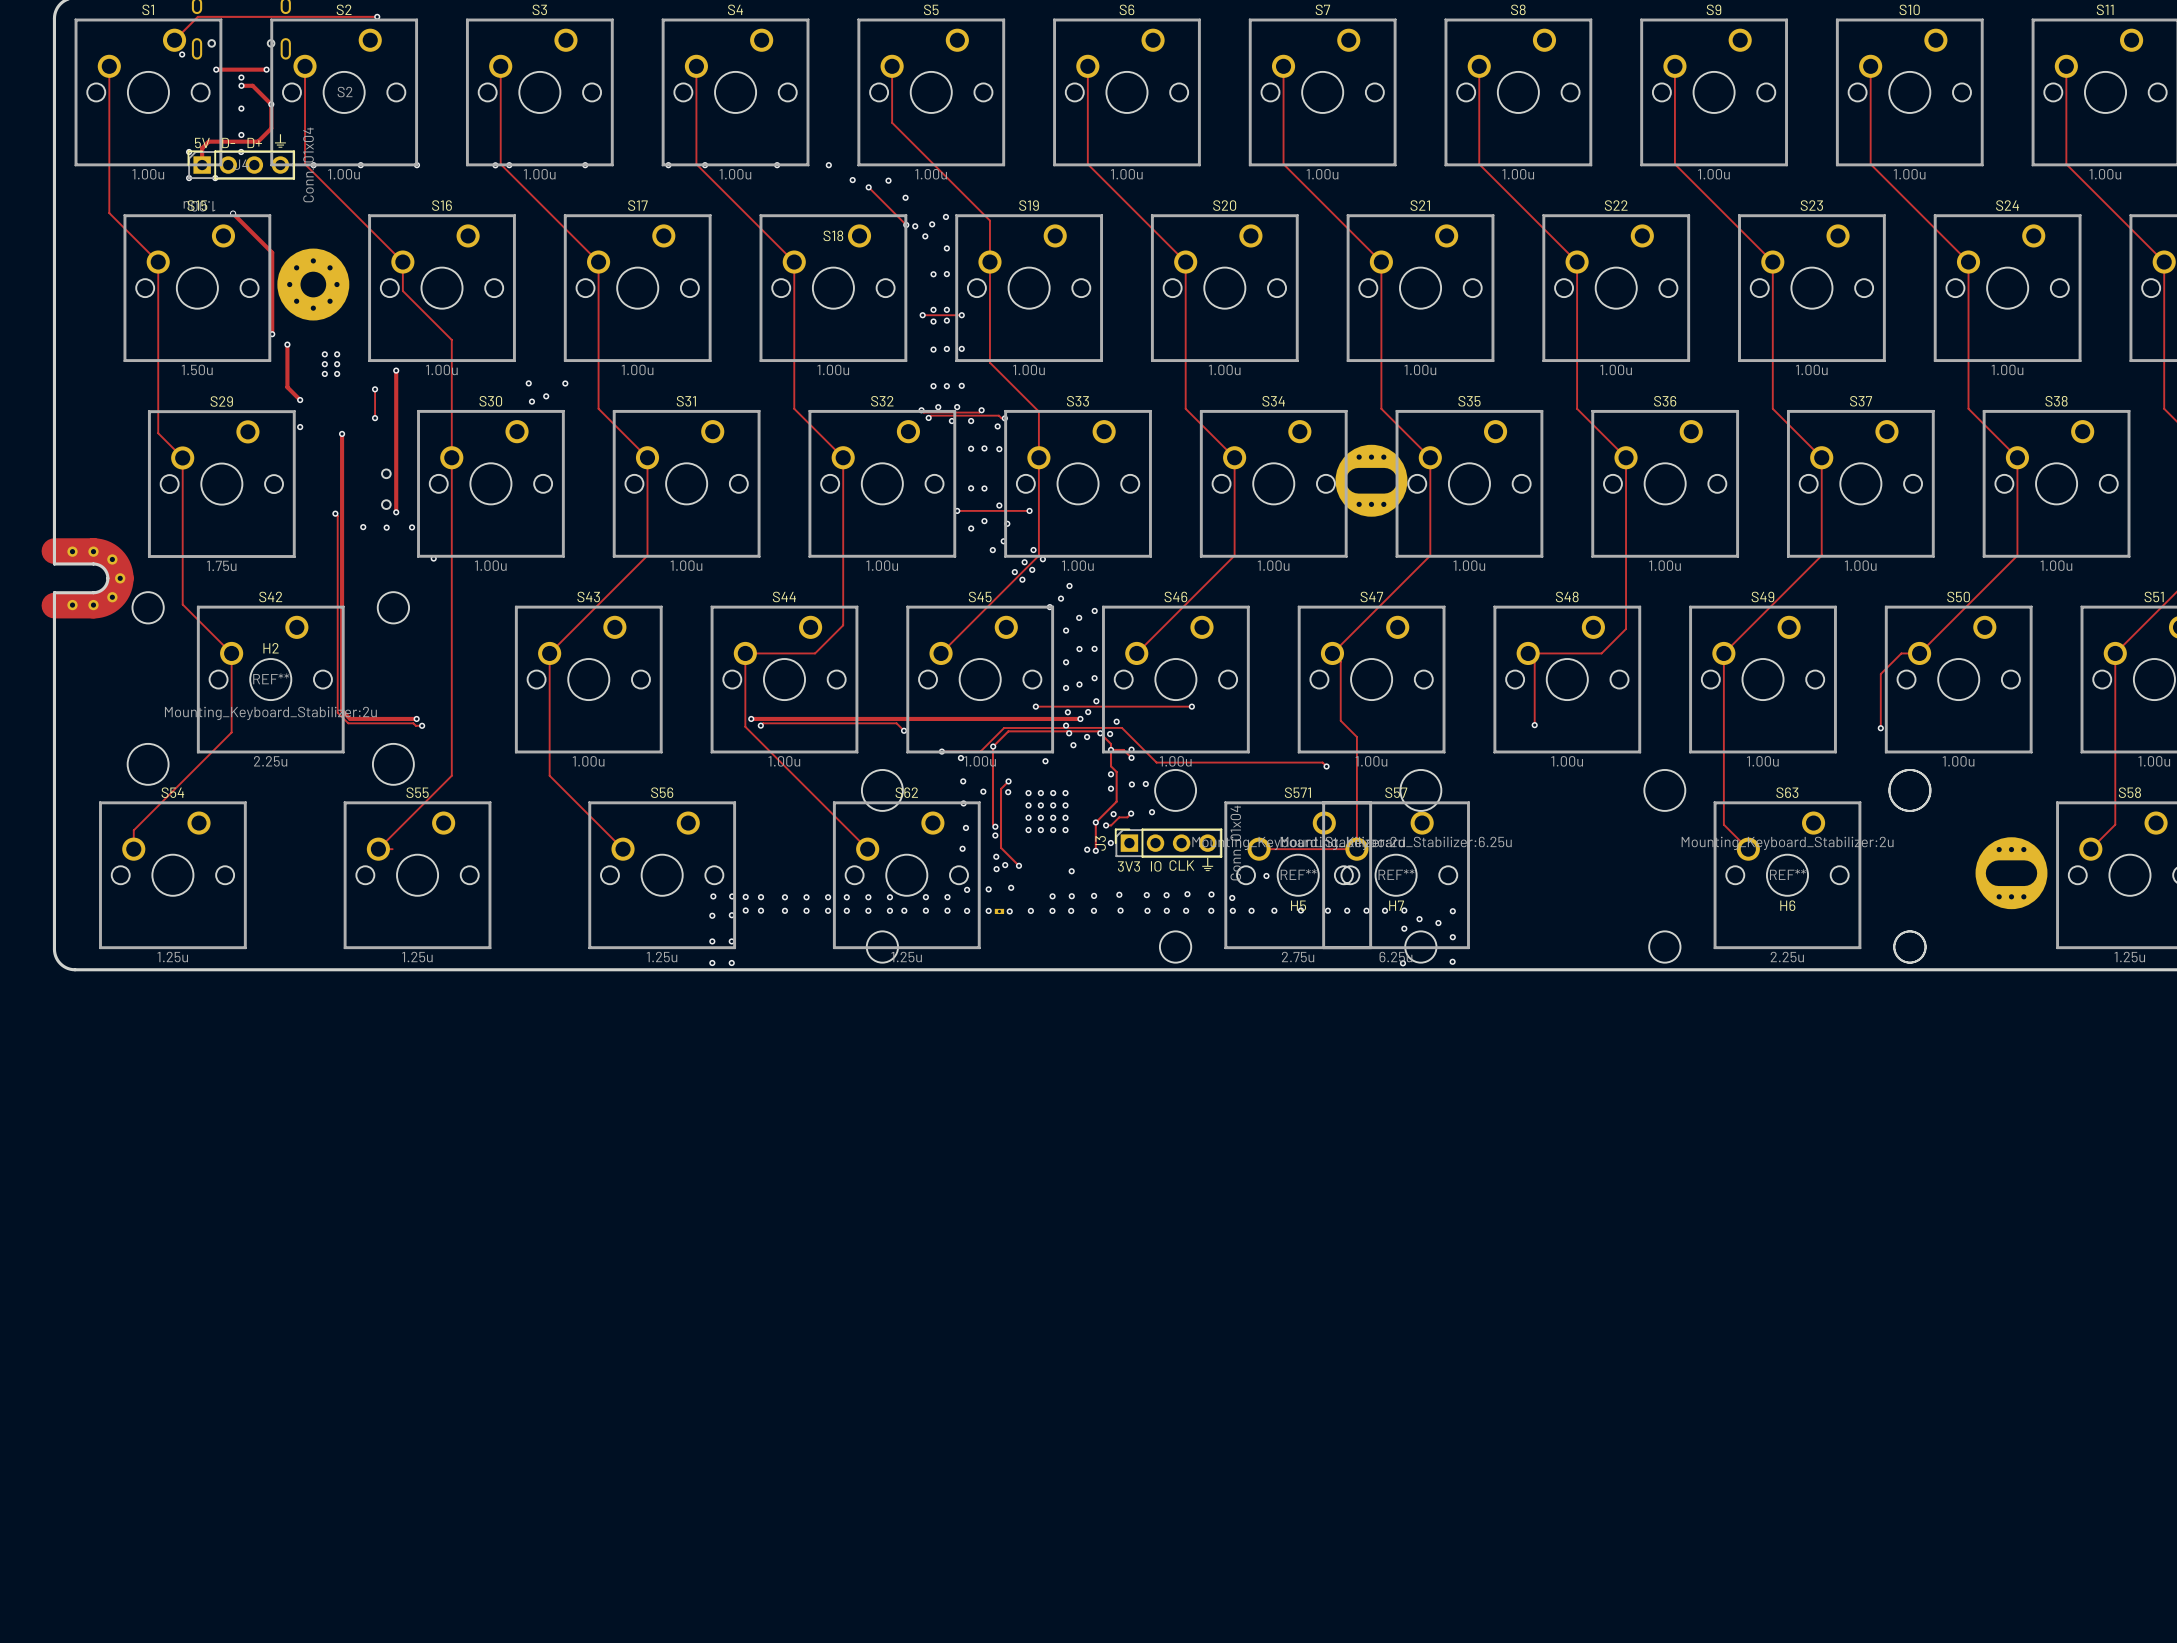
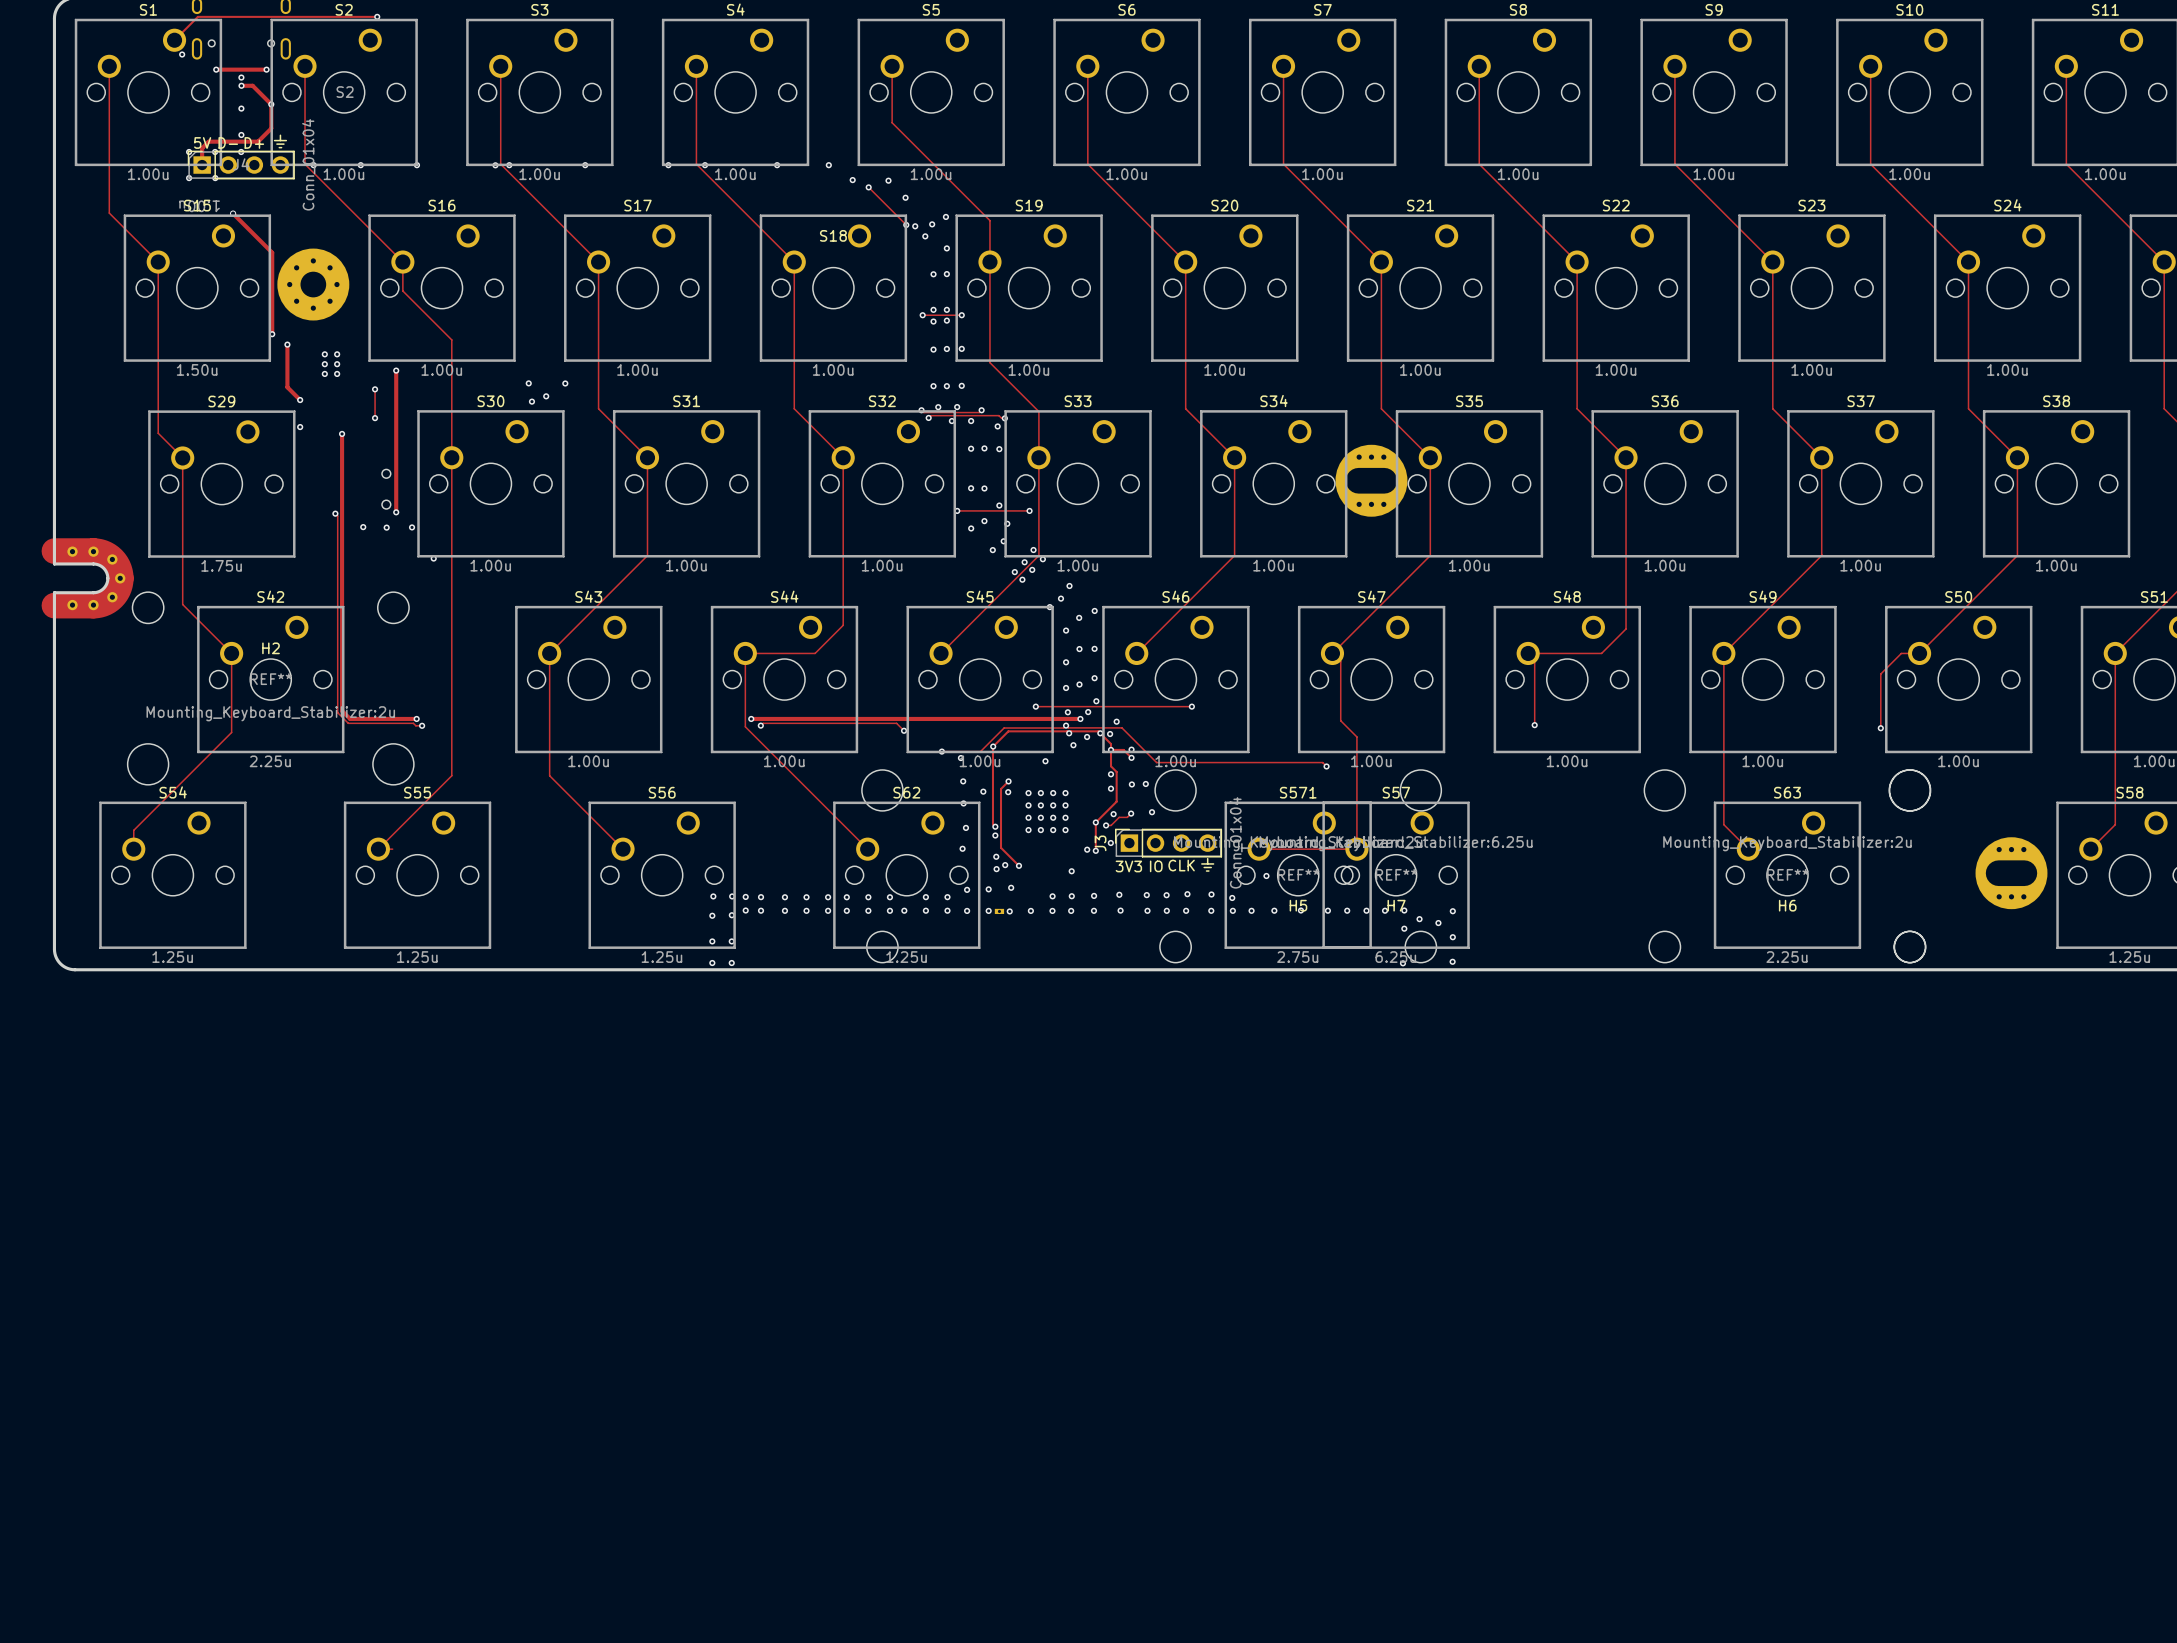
via: none -> (215, 151)

